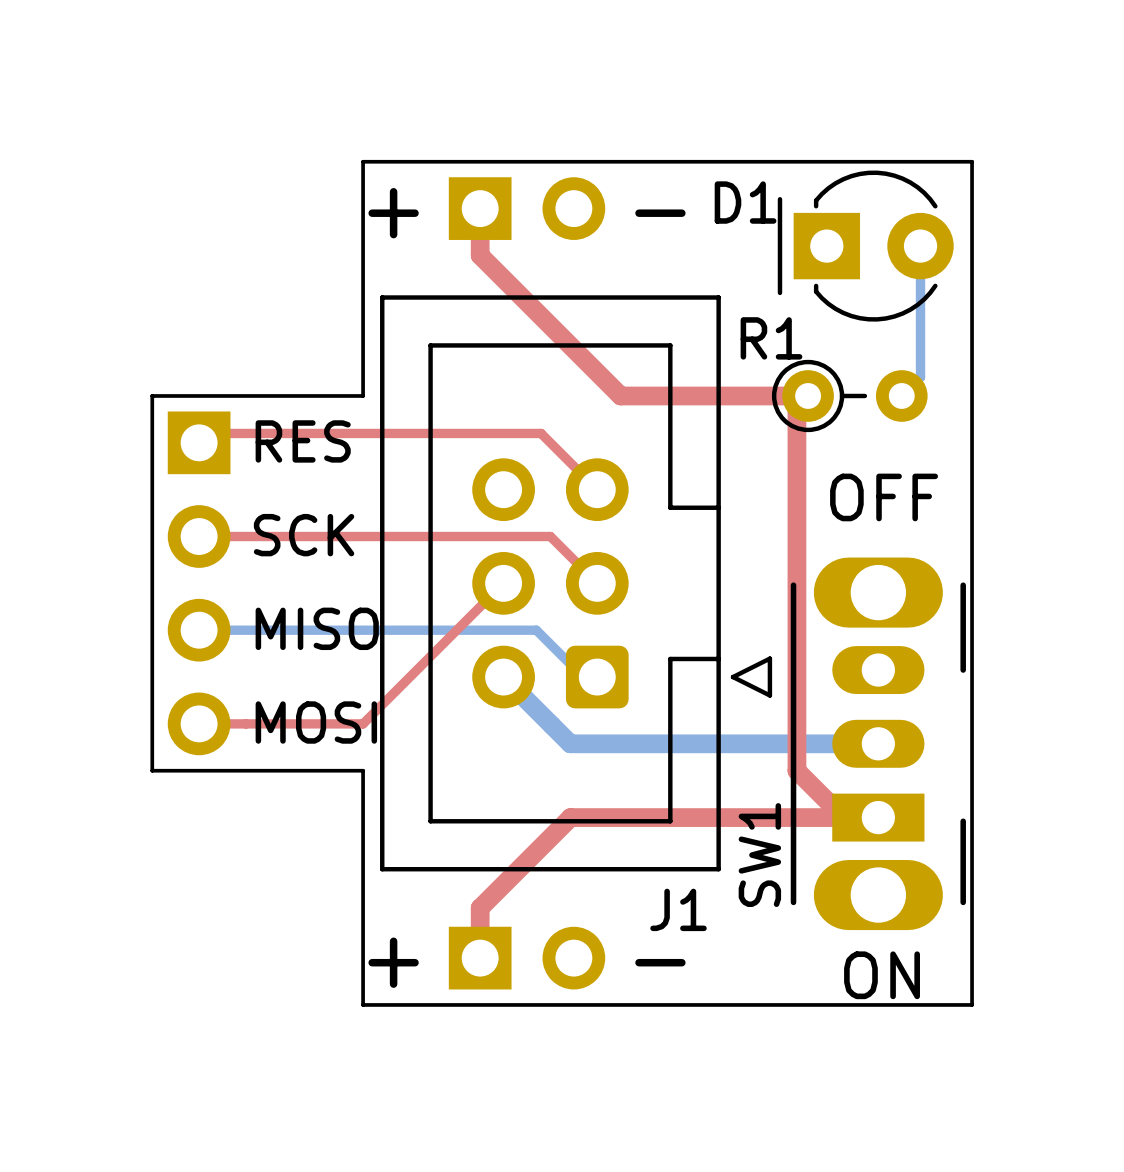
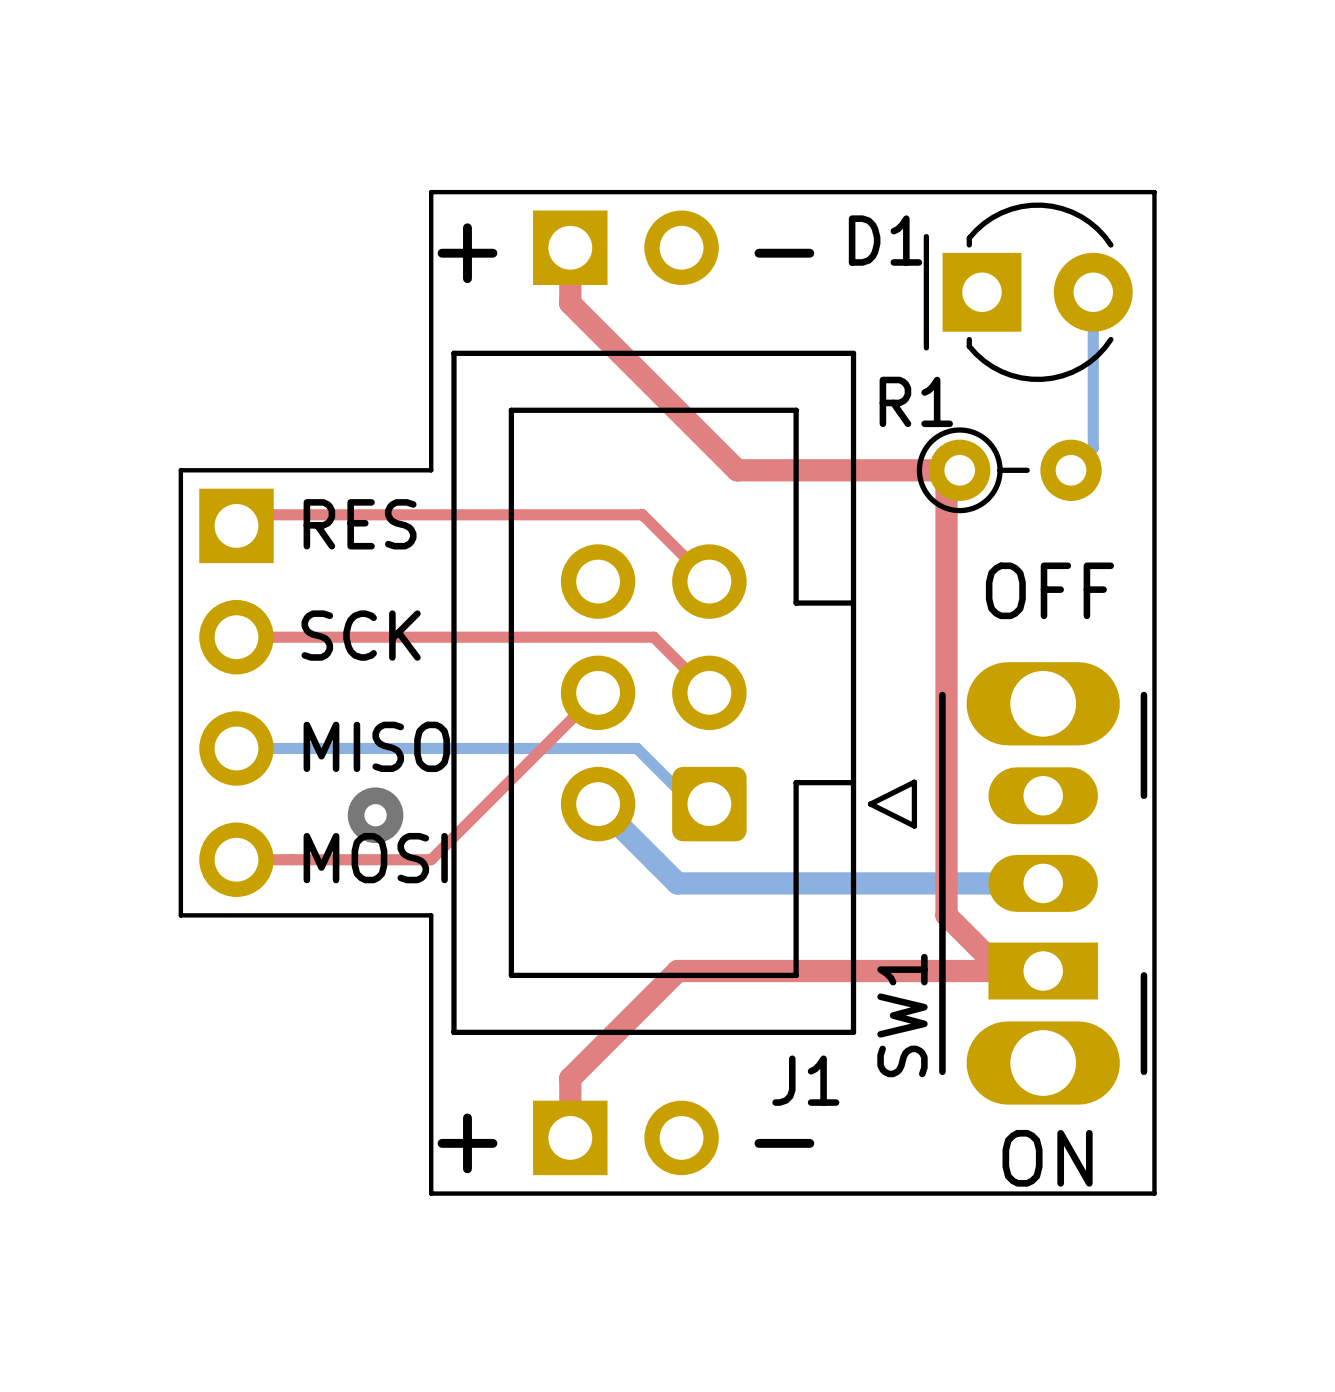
via: none -> (375, 815)

